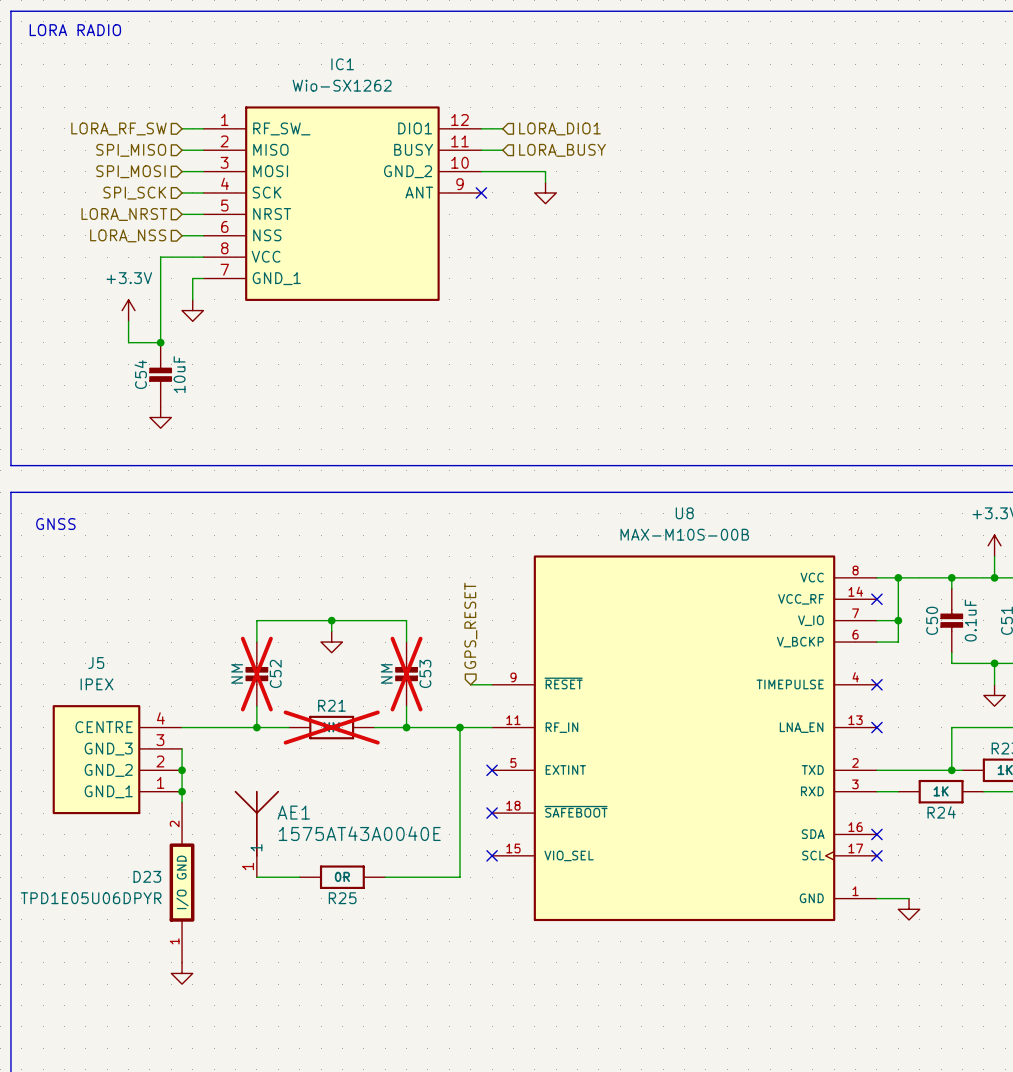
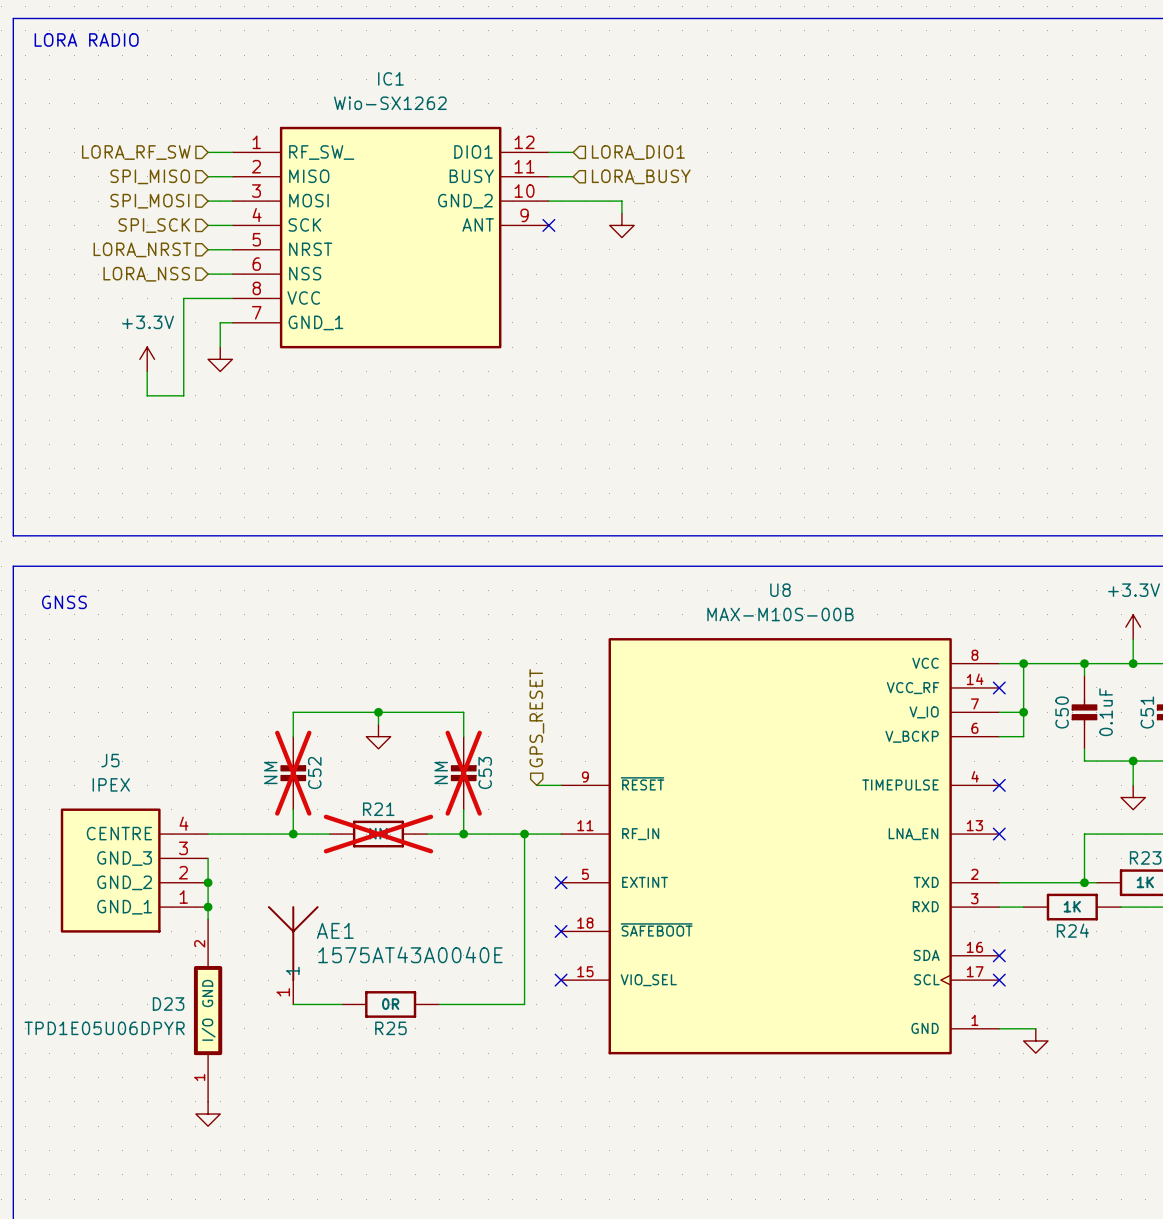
junction: (160, 342) -> none
C54: 10uF (160, 374) -> none
power symbol: (160, 417) -> none

